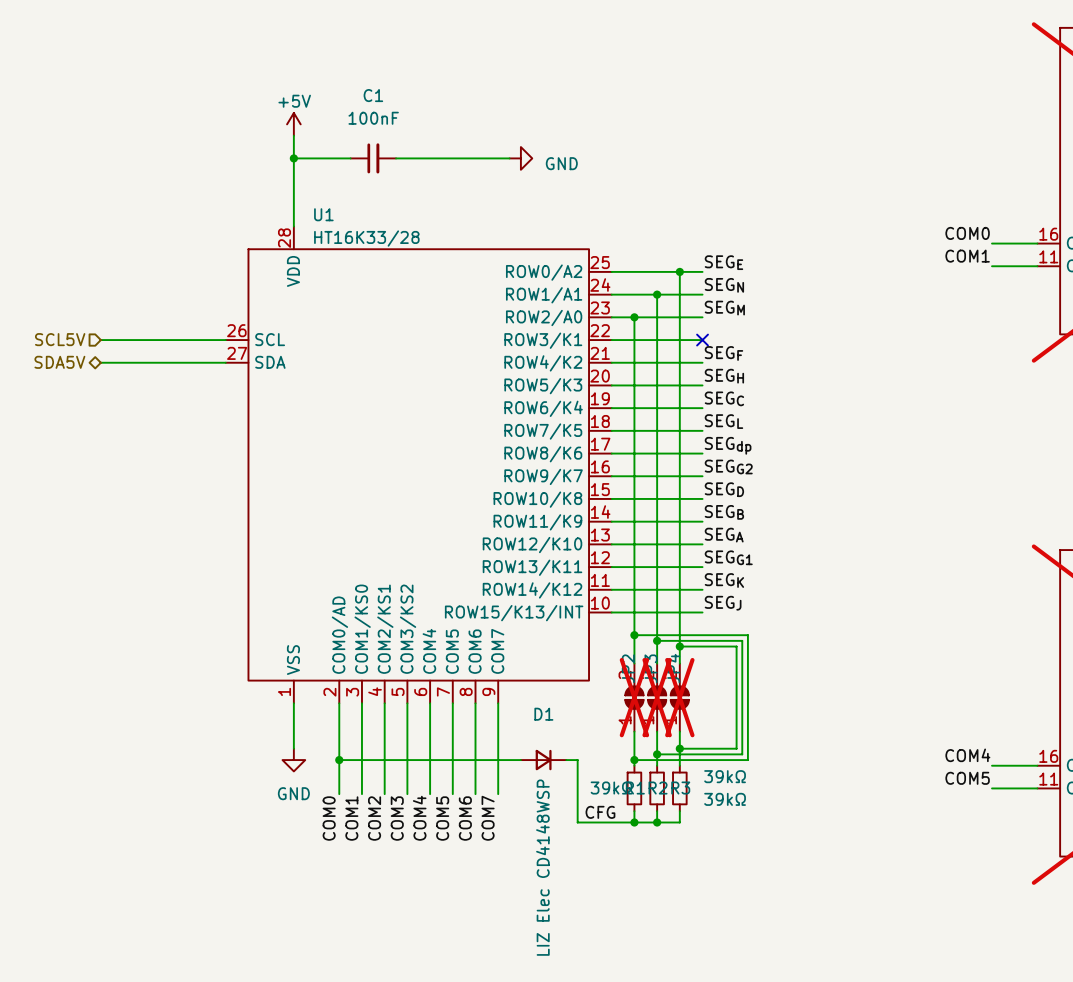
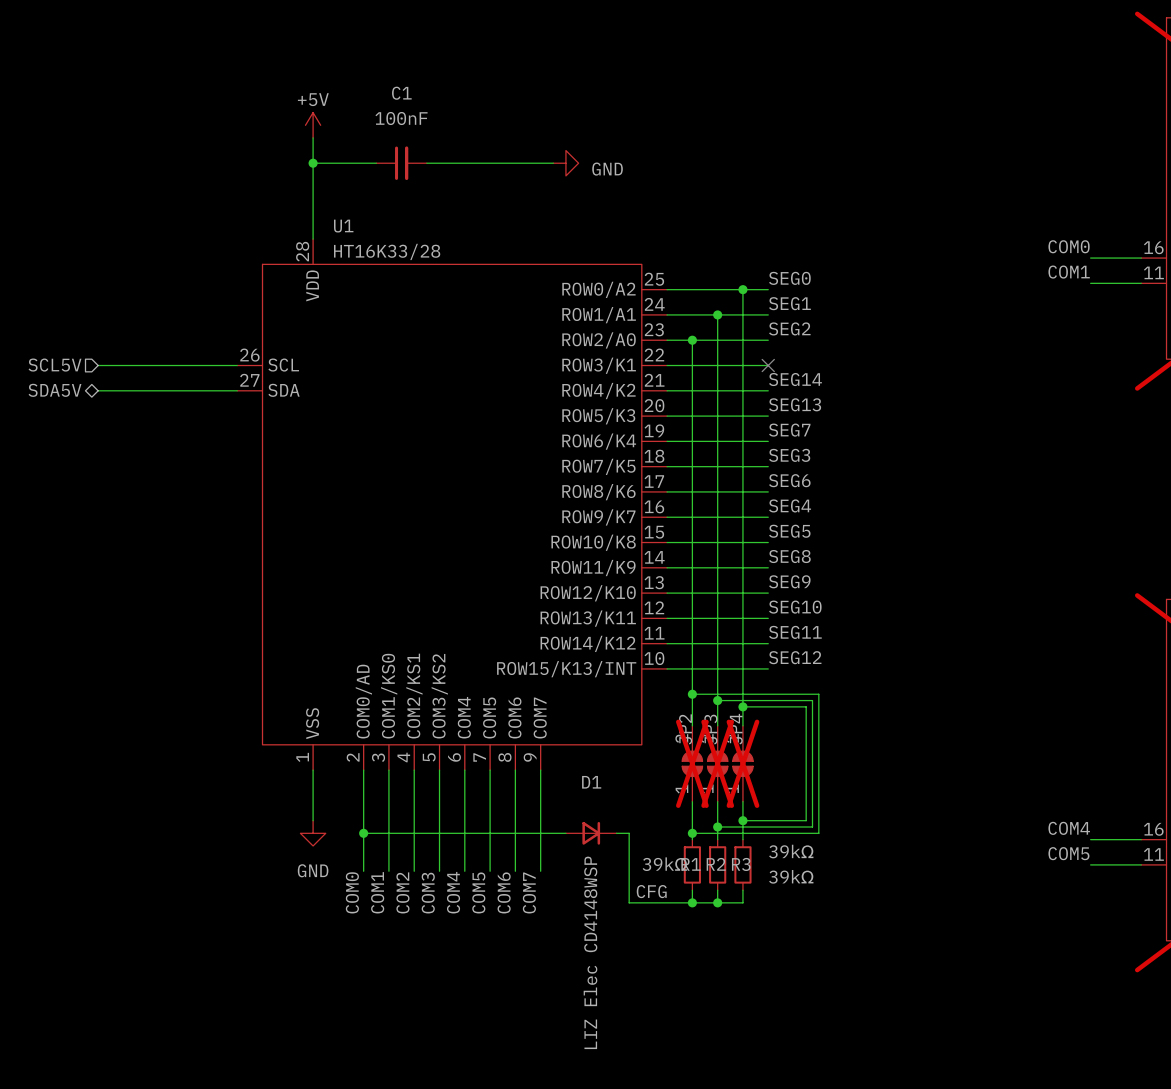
label: SEGE (723, 262) -> SEG0 (789, 278)
label: SEGN (724, 285) -> SEG1 (789, 303)
label: SEGM (724, 308) -> SEG2 (789, 328)
label: SEGF (723, 353) -> SEG14 (795, 379)
label: SEGH (724, 376) -> SEG13 (795, 404)
label: SEGC (724, 398) -> SEG7 (789, 430)
label: SEGL (723, 421) -> SEG3 (789, 455)
label: SEGdp (728, 445) -> SEG6 (789, 480)
label: SEGG2 (728, 466) -> SEG4 (790, 505)
label: SEGD (724, 489) -> SEG5 (789, 531)
label: SEGB (724, 512) -> SEG8 (789, 556)
label: SEGA (724, 535) -> SEG9 (789, 581)
label: SEGG1 (728, 557) -> SEG10 (795, 607)
label: SEGK (724, 580) -> SEG11 (795, 632)
label: SEGJ (723, 603) -> SEG12 (795, 657)

